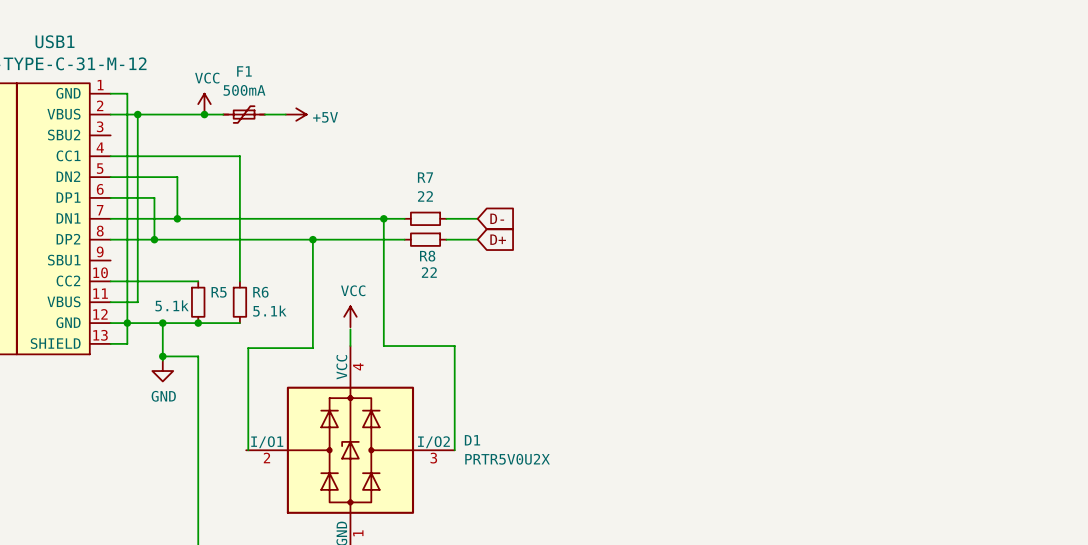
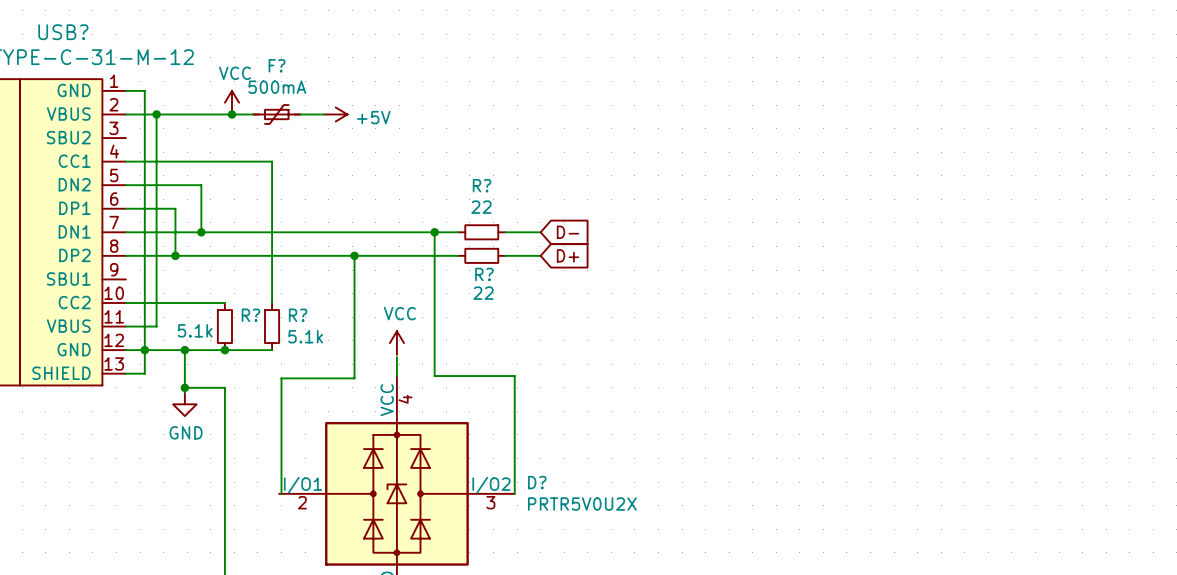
USB1 name: USB1 (55, 41) -> USB? (63, 32)
F1 name: F1 (244, 71) -> F? (277, 65)
R7 name: R7 (425, 177) -> R? (482, 185)
R8 name: R8 (427, 256) -> R? (484, 274)
R5 name: R5 (219, 292) -> R? (250, 315)
R6 name: R6 (260, 292) -> R? (298, 315)
D1 name: D1 (472, 440) -> D? (537, 482)

